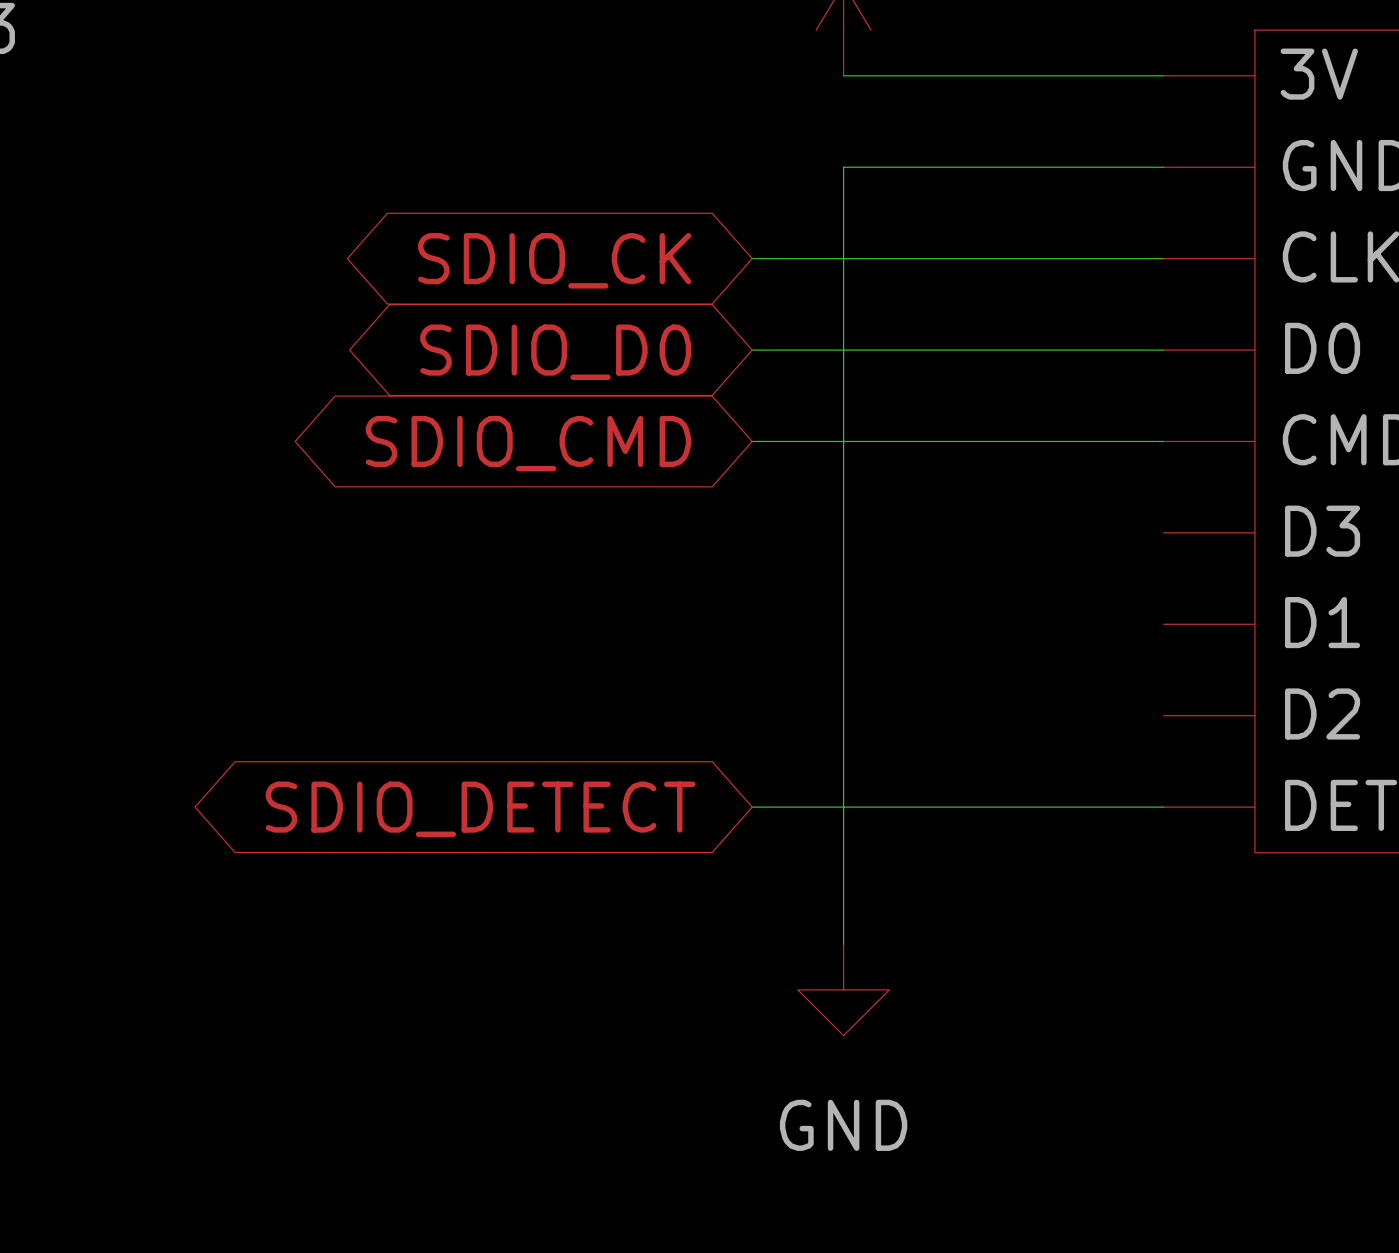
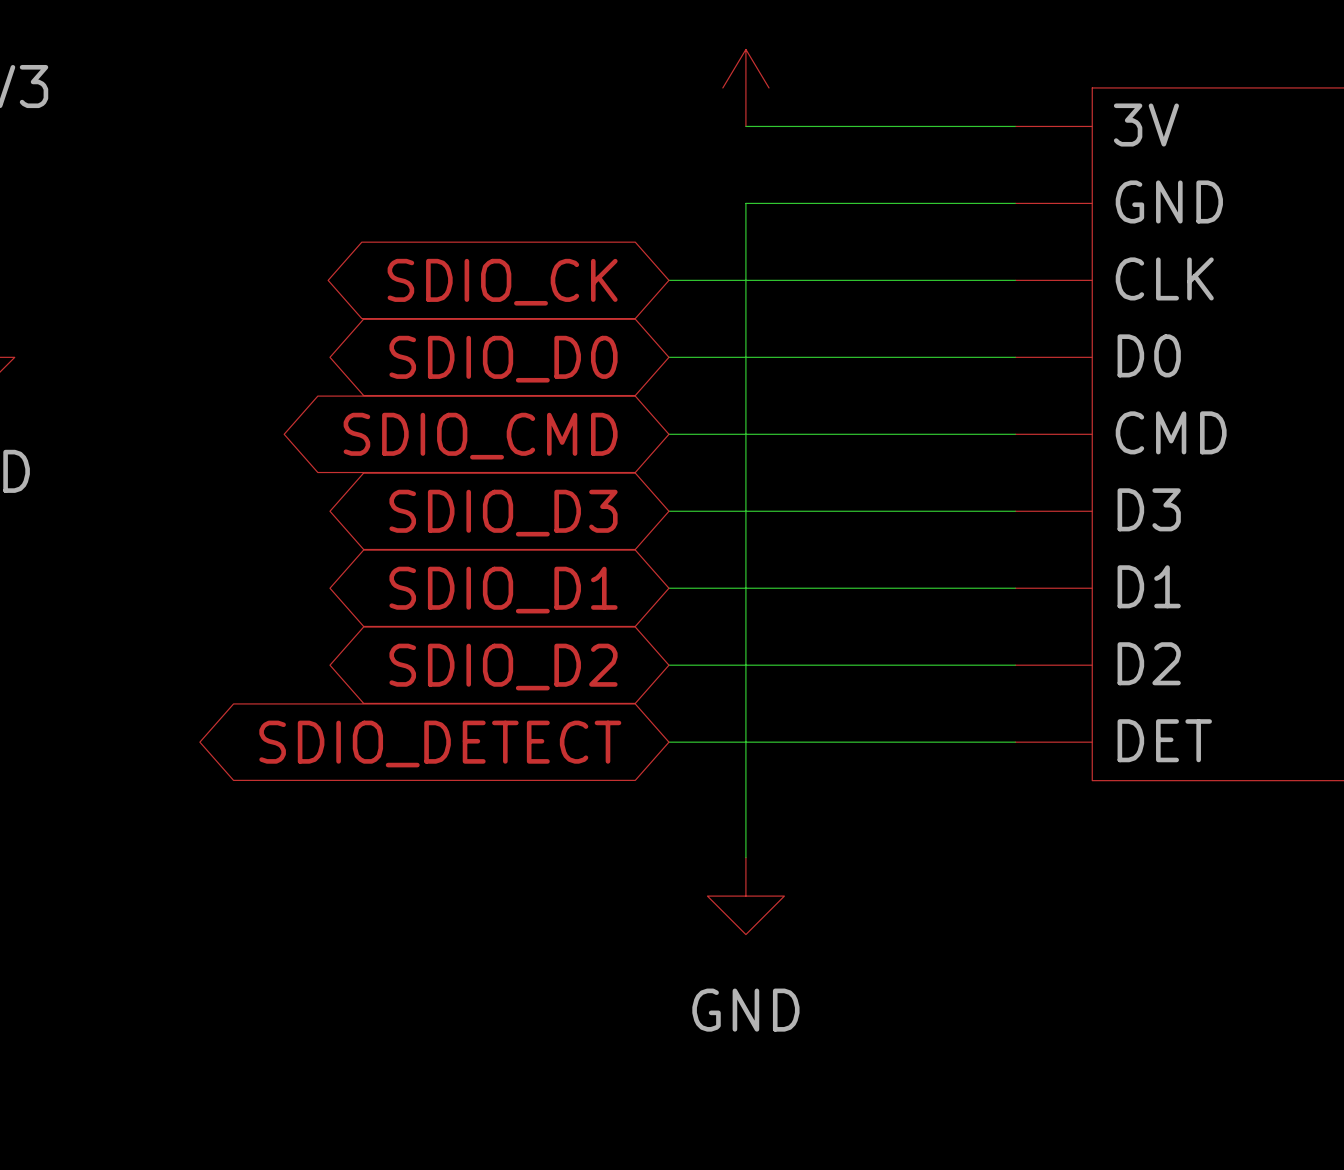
wire: none -> (668, 511) (1015, 511)
global label: none -> SDIO_D3 (503, 513)
wire: none -> (668, 588) (1015, 588)
global label: none -> SDIO_D1 (503, 590)
wire: none -> (668, 665) (1015, 665)
global label: none -> SDIO_D2 (503, 667)

